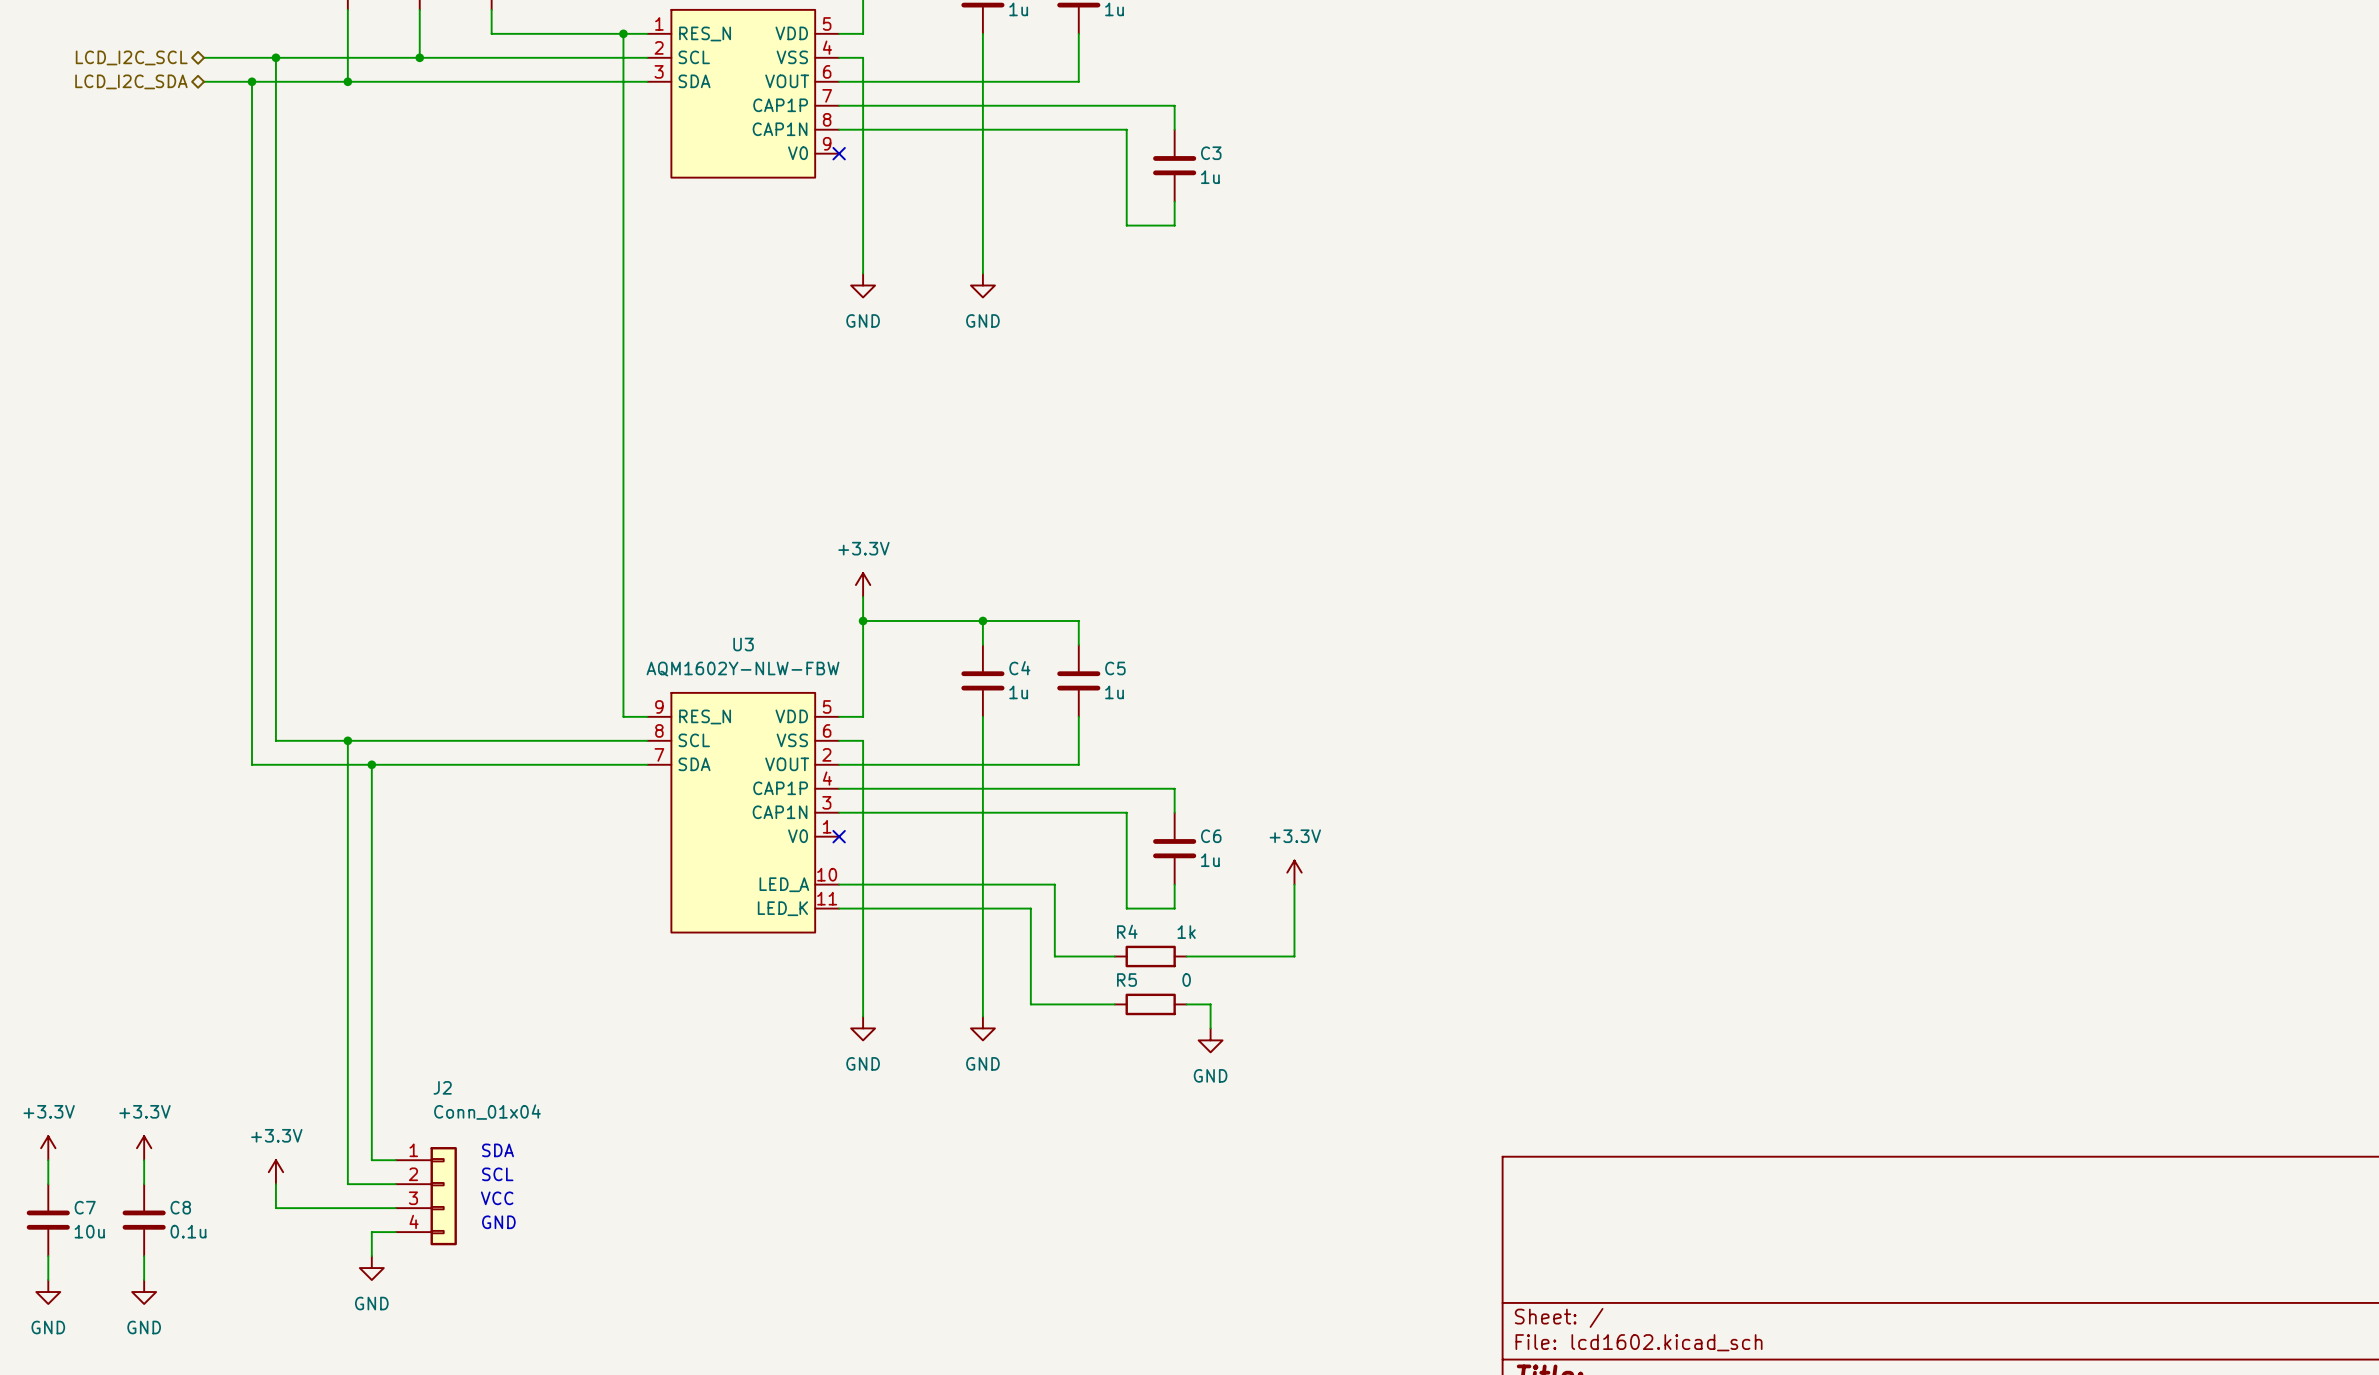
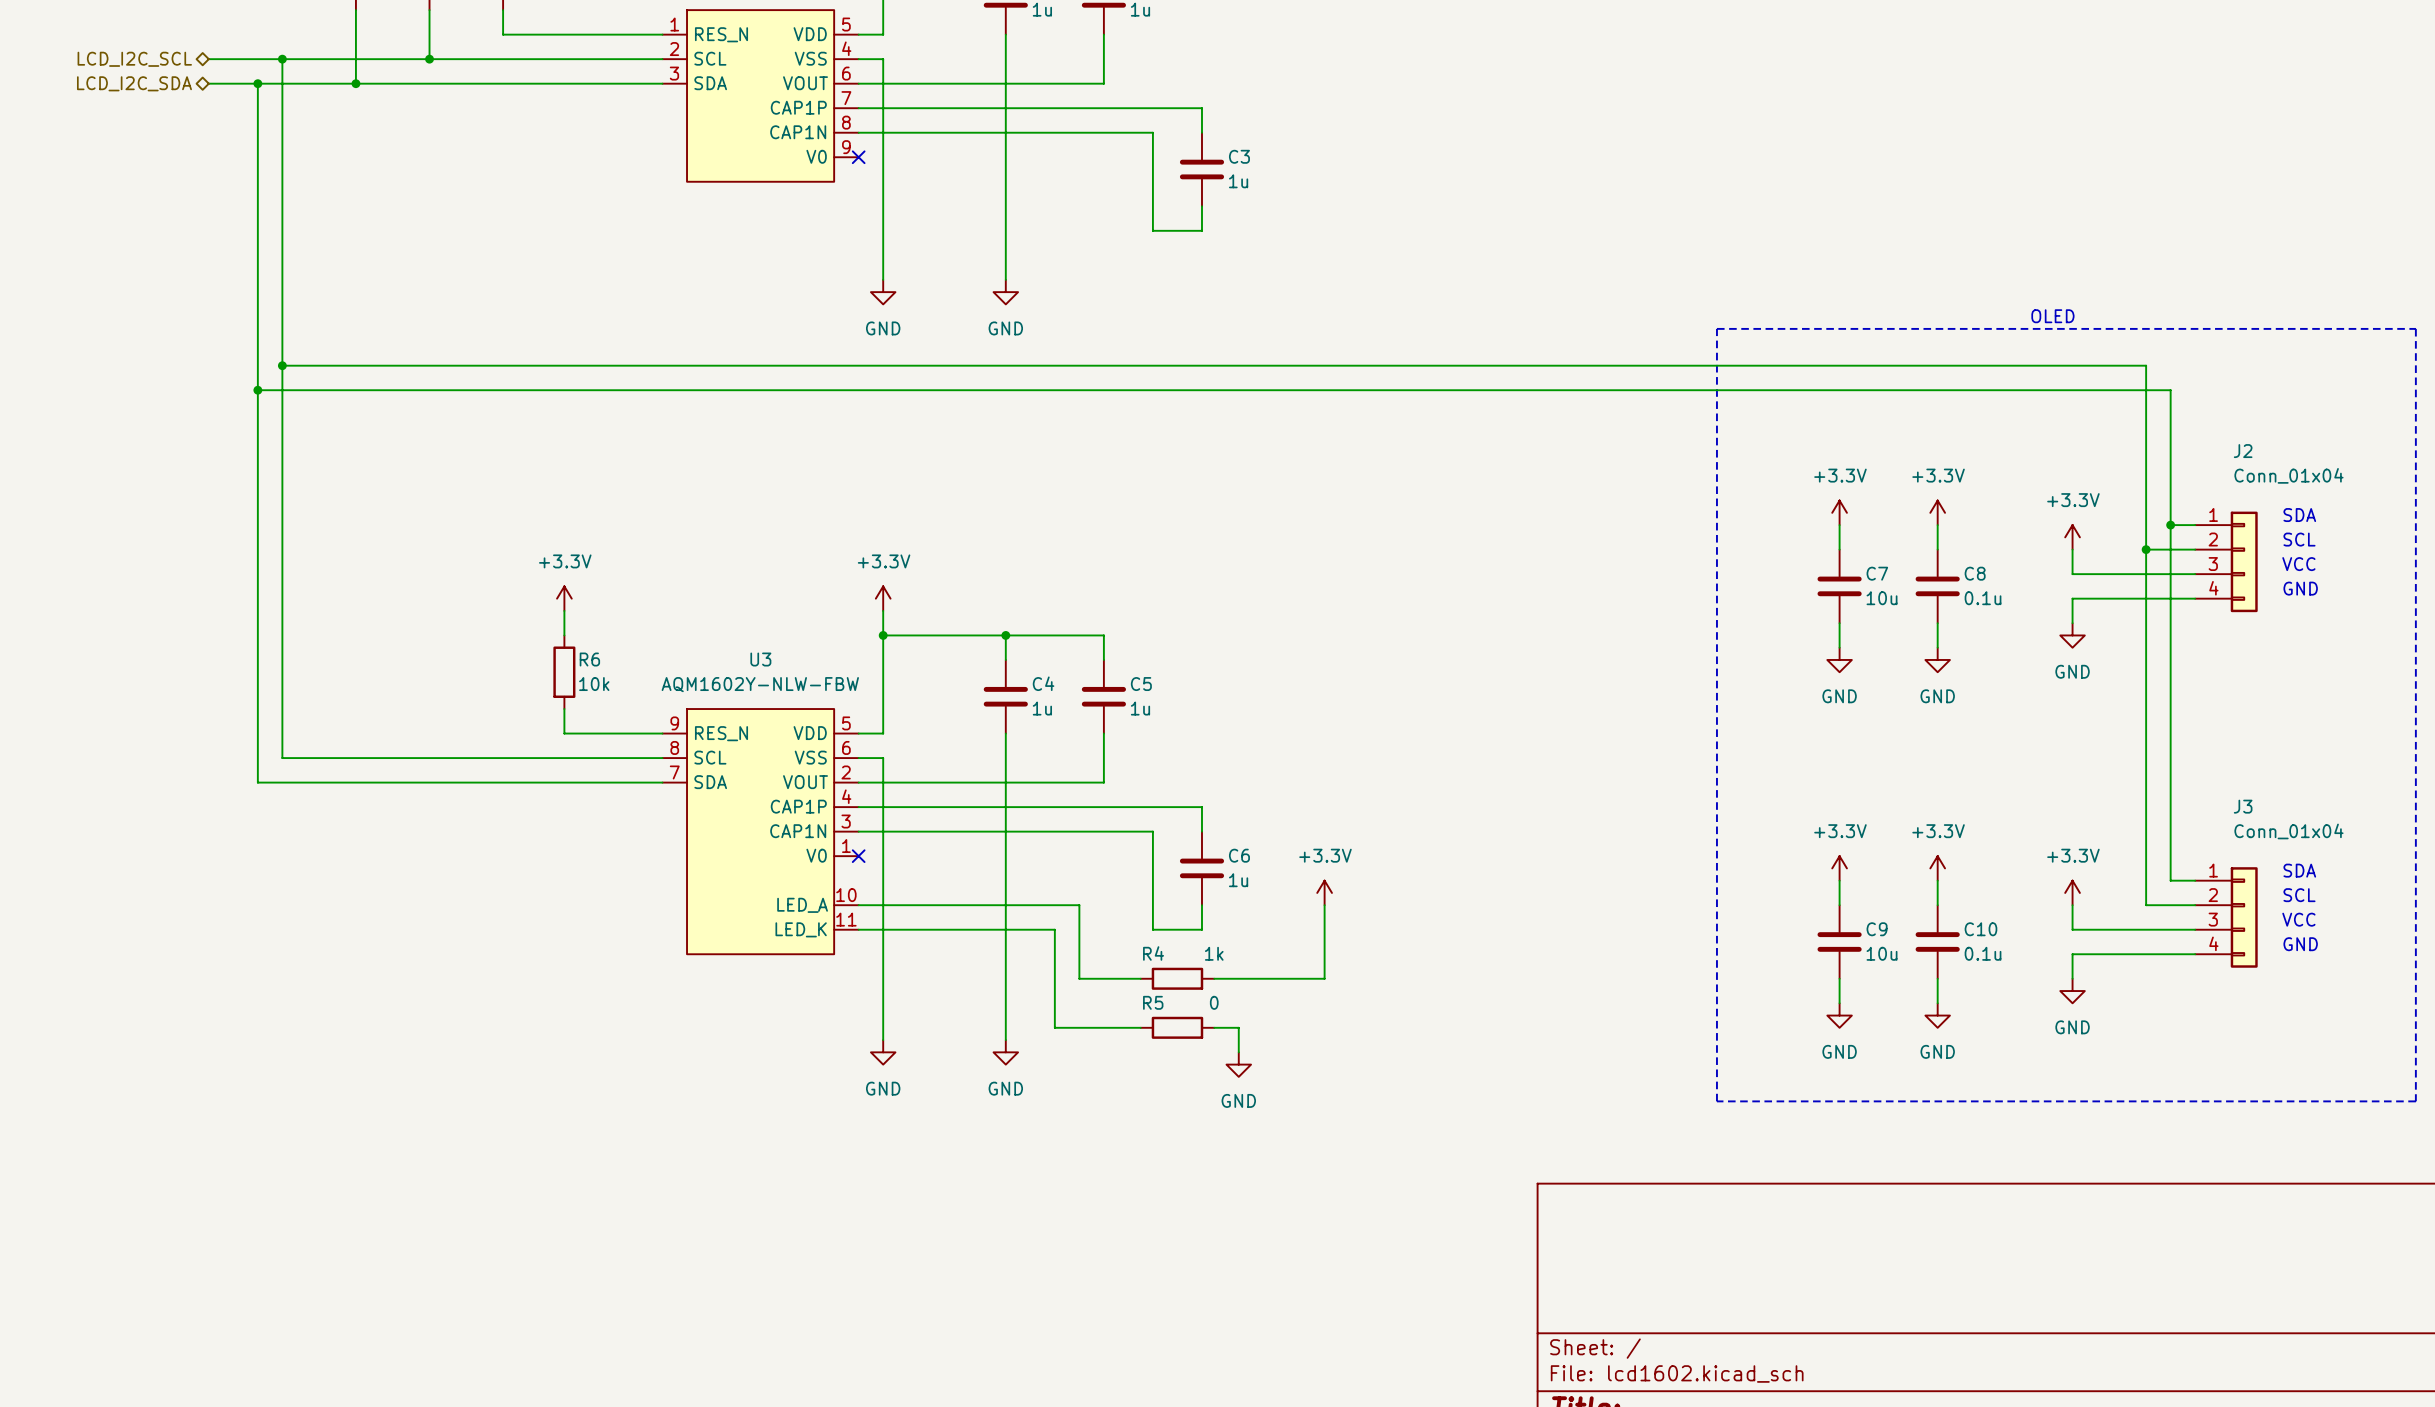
wire: (623, 33) (623, 716) -> (564, 709) (564, 733) (637, 733)
junction: (623, 33) -> none
text: none -> OLED (2052, 316)
line: none -> (1716, 328) (2415, 328) (2415, 1101) (1716, 1101) (1716, 328)
wire: none -> (282, 365) (2146, 365) (2146, 905) (2195, 905)
junction: none -> (282, 365)
wire: none -> (257, 390) (2170, 390) (2170, 880) (2195, 880)
junction: none -> (257, 390)
power symbol: none -> +3.3V (1839, 512)
power symbol: none -> +3.3V (1937, 512)
text: none -> SDA (2299, 515)
wire: none -> (1839, 525) (1839, 549)
wire: none -> (1937, 525) (1937, 549)
wire: none -> (2170, 525) (2195, 525)
junction: none -> (2170, 525)
power symbol: none -> +3.3V (2072, 537)
text: none -> SCL (2299, 539)
wire: none -> (2072, 549) (2072, 574) (2195, 574)
wire: none -> (2146, 549) (2195, 549)
junction: none -> (2146, 549)
text: none -> VCC (2298, 564)
text: none -> GND (2300, 588)
power symbol: none -> +3.3V (564, 598)
wire: none -> (2195, 598) (2072, 598) (2072, 623)
wire: none -> (564, 610) (564, 635)
wire: none -> (1839, 623) (1839, 647)
wire: none -> (1937, 623) (1937, 647)
power symbol: none -> GND (2072, 635)
power symbol: none -> GND (1839, 659)
power symbol: none -> GND (1937, 659)
R6: none -> 10k (564, 672)
wire: (347, 740) (347, 1184) (395, 1184) -> none
junction: (347, 740) -> none
wire: (371, 764) (371, 1160) (395, 1160) -> none
junction: (371, 764) -> none
power symbol: none -> +3.3V (1839, 868)
power symbol: none -> +3.3V (1937, 868)
text: none -> SDA (2299, 870)
wire: none -> (1839, 880) (1839, 905)
wire: none -> (1937, 880) (1937, 905)
power symbol: none -> +3.3V (2072, 892)
text: none -> SCL (2299, 895)
wire: none -> (2072, 905) (2072, 929) (2195, 929)
J3: none -> Conn_01x04 (2226, 917)
text: none -> VCC (2298, 919)
C9: none -> 10u (1839, 941)
C10: none -> 0.1u (1937, 941)
text: none -> GND (2300, 944)
wire: none -> (2195, 954) (2072, 954) (2072, 978)
wire: none -> (1839, 978) (1839, 1003)
wire: none -> (1937, 978) (1937, 1003)
power symbol: none -> GND (2072, 991)
power symbol: none -> GND (1839, 1015)
power symbol: none -> GND (1937, 1015)
power symbol: +3.3V (48, 1148) -> none
power symbol: +3.3V (144, 1148) -> none
text: SDA (498, 1150) -> none
wire: (48, 1160) (48, 1184) -> none
wire: (144, 1160) (144, 1184) -> none
power symbol: +3.3V (275, 1172) -> none
text: SCL (497, 1174) -> none
wire: (275, 1184) (275, 1208) (395, 1208) -> none
J2 position: (426, 1196) -> (2226, 561)
text: VCC (497, 1198) -> none
C7 position: (48, 1220) -> (1839, 586)
C8 position: (144, 1220) -> (1937, 586)
text: GND (498, 1222) -> none
wire: (395, 1232) (371, 1232) (371, 1256) -> none
wire: (48, 1256) (48, 1280) -> none
wire: (144, 1256) (144, 1280) -> none
power symbol: GND (371, 1268) -> none
power symbol: GND (48, 1292) -> none
power symbol: GND (144, 1292) -> none

